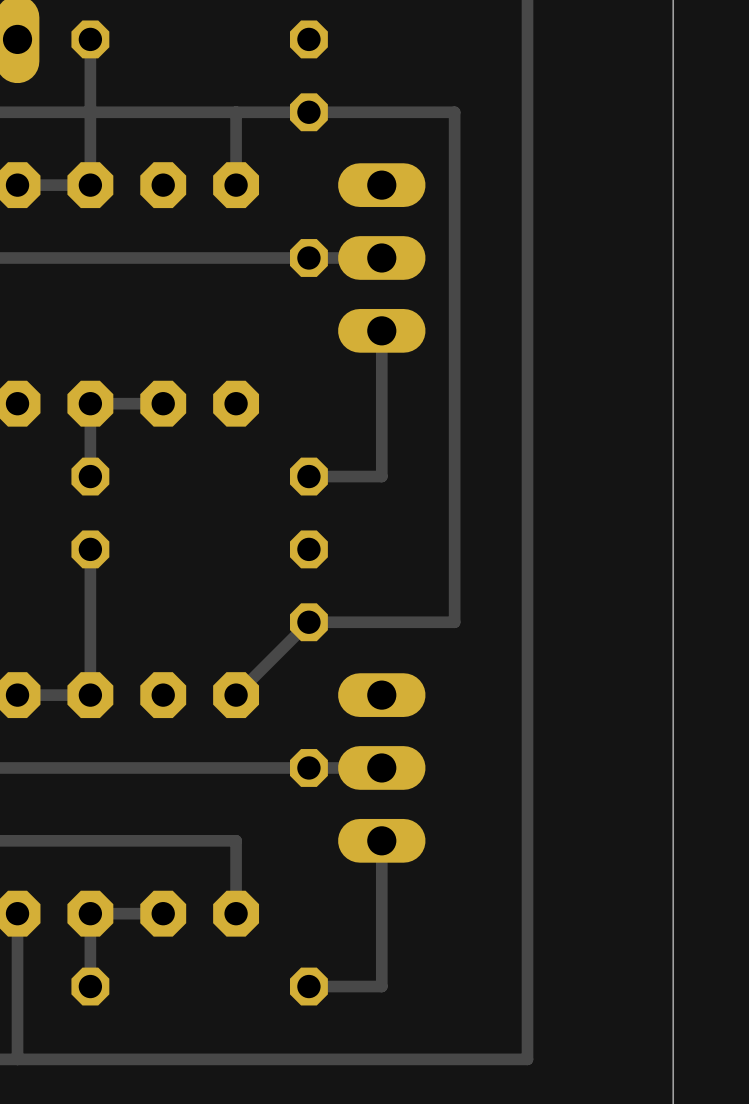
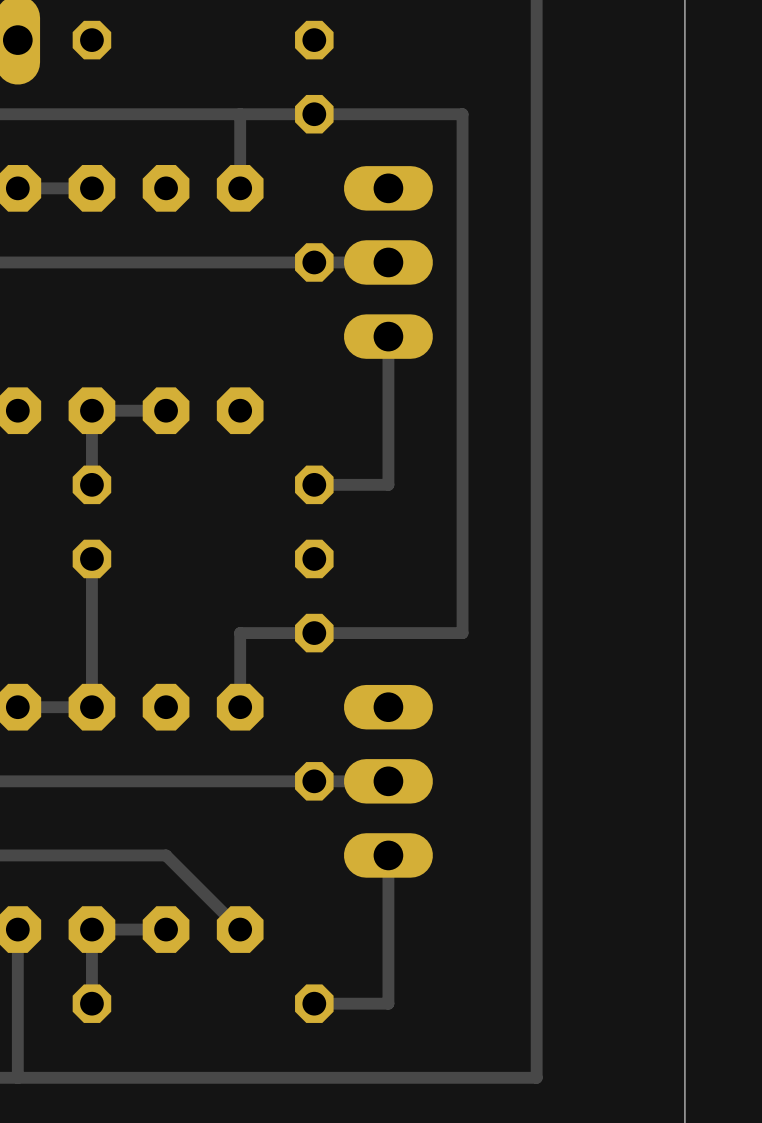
track: (90, 39) (90, 185) -> none
track: (308, 622) (236, 695) -> (314, 633) (240, 633) (240, 707)
track: (163, 840) (236, 840) (236, 913) -> (166, 855) (240, 929)

